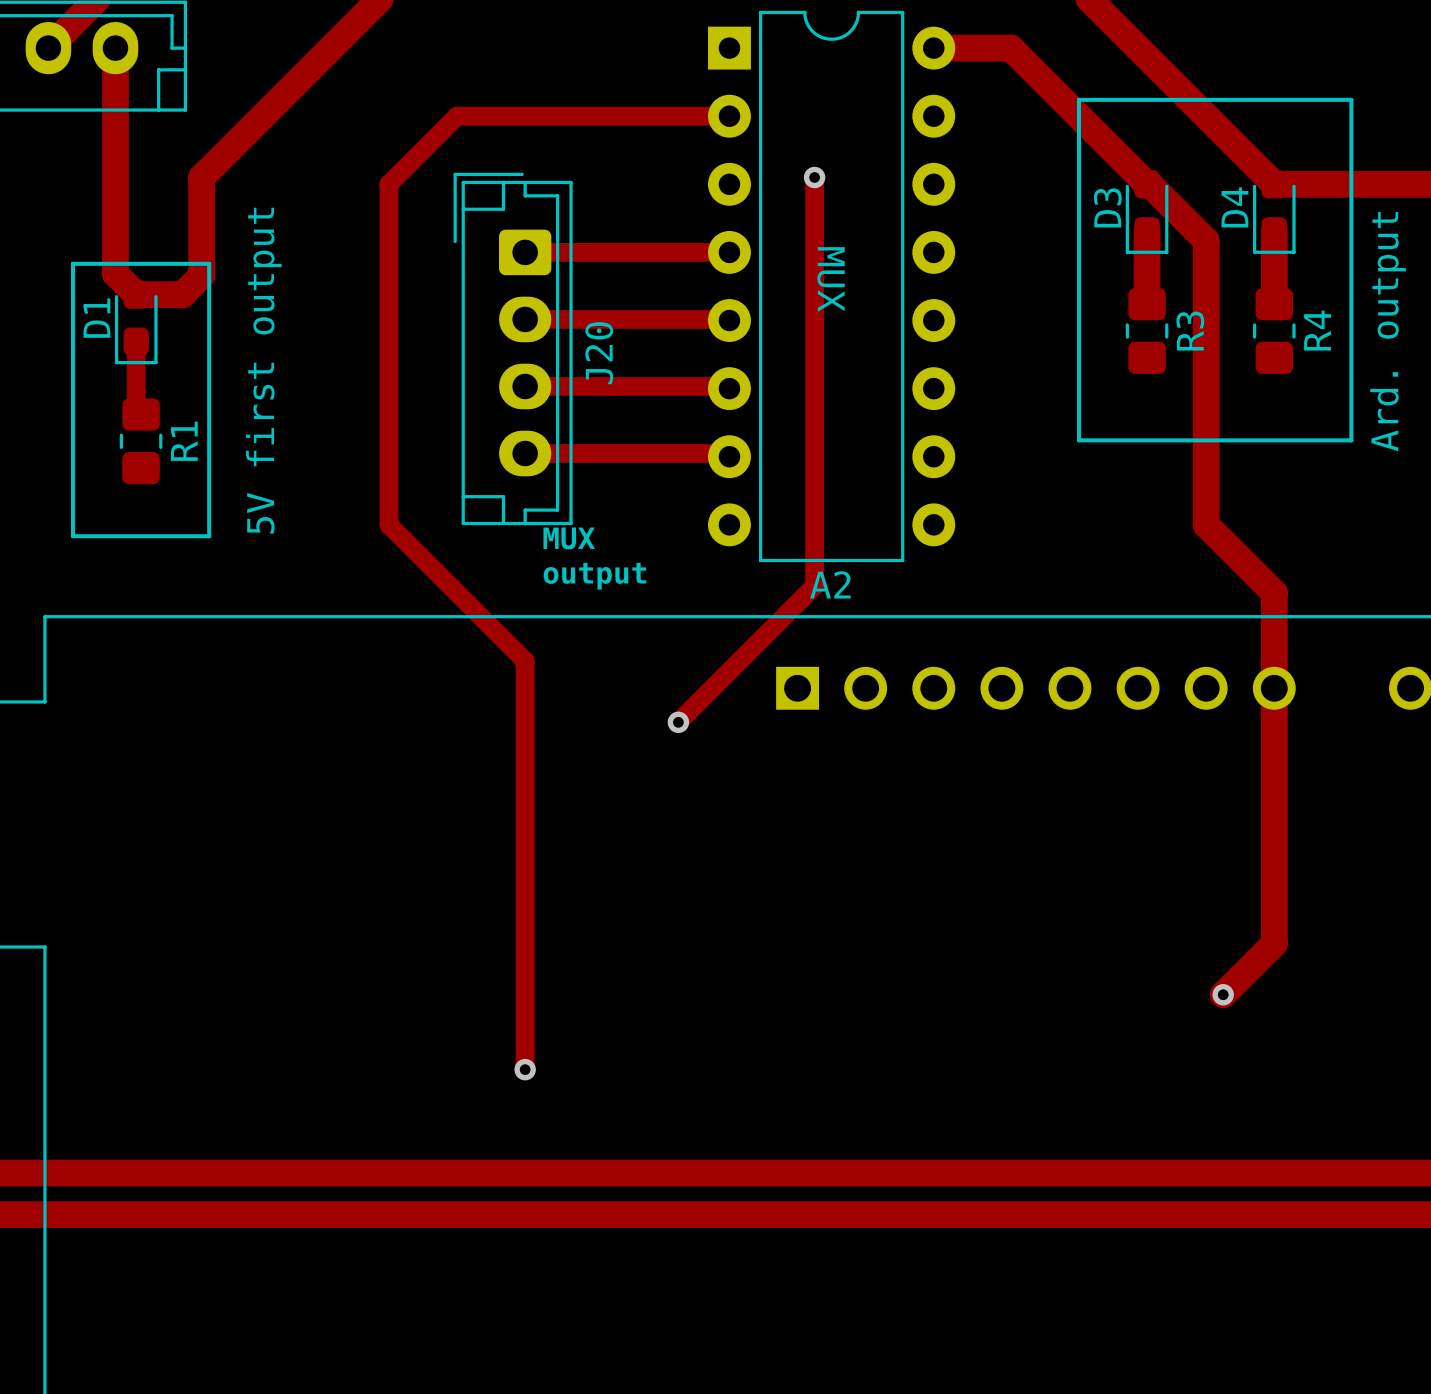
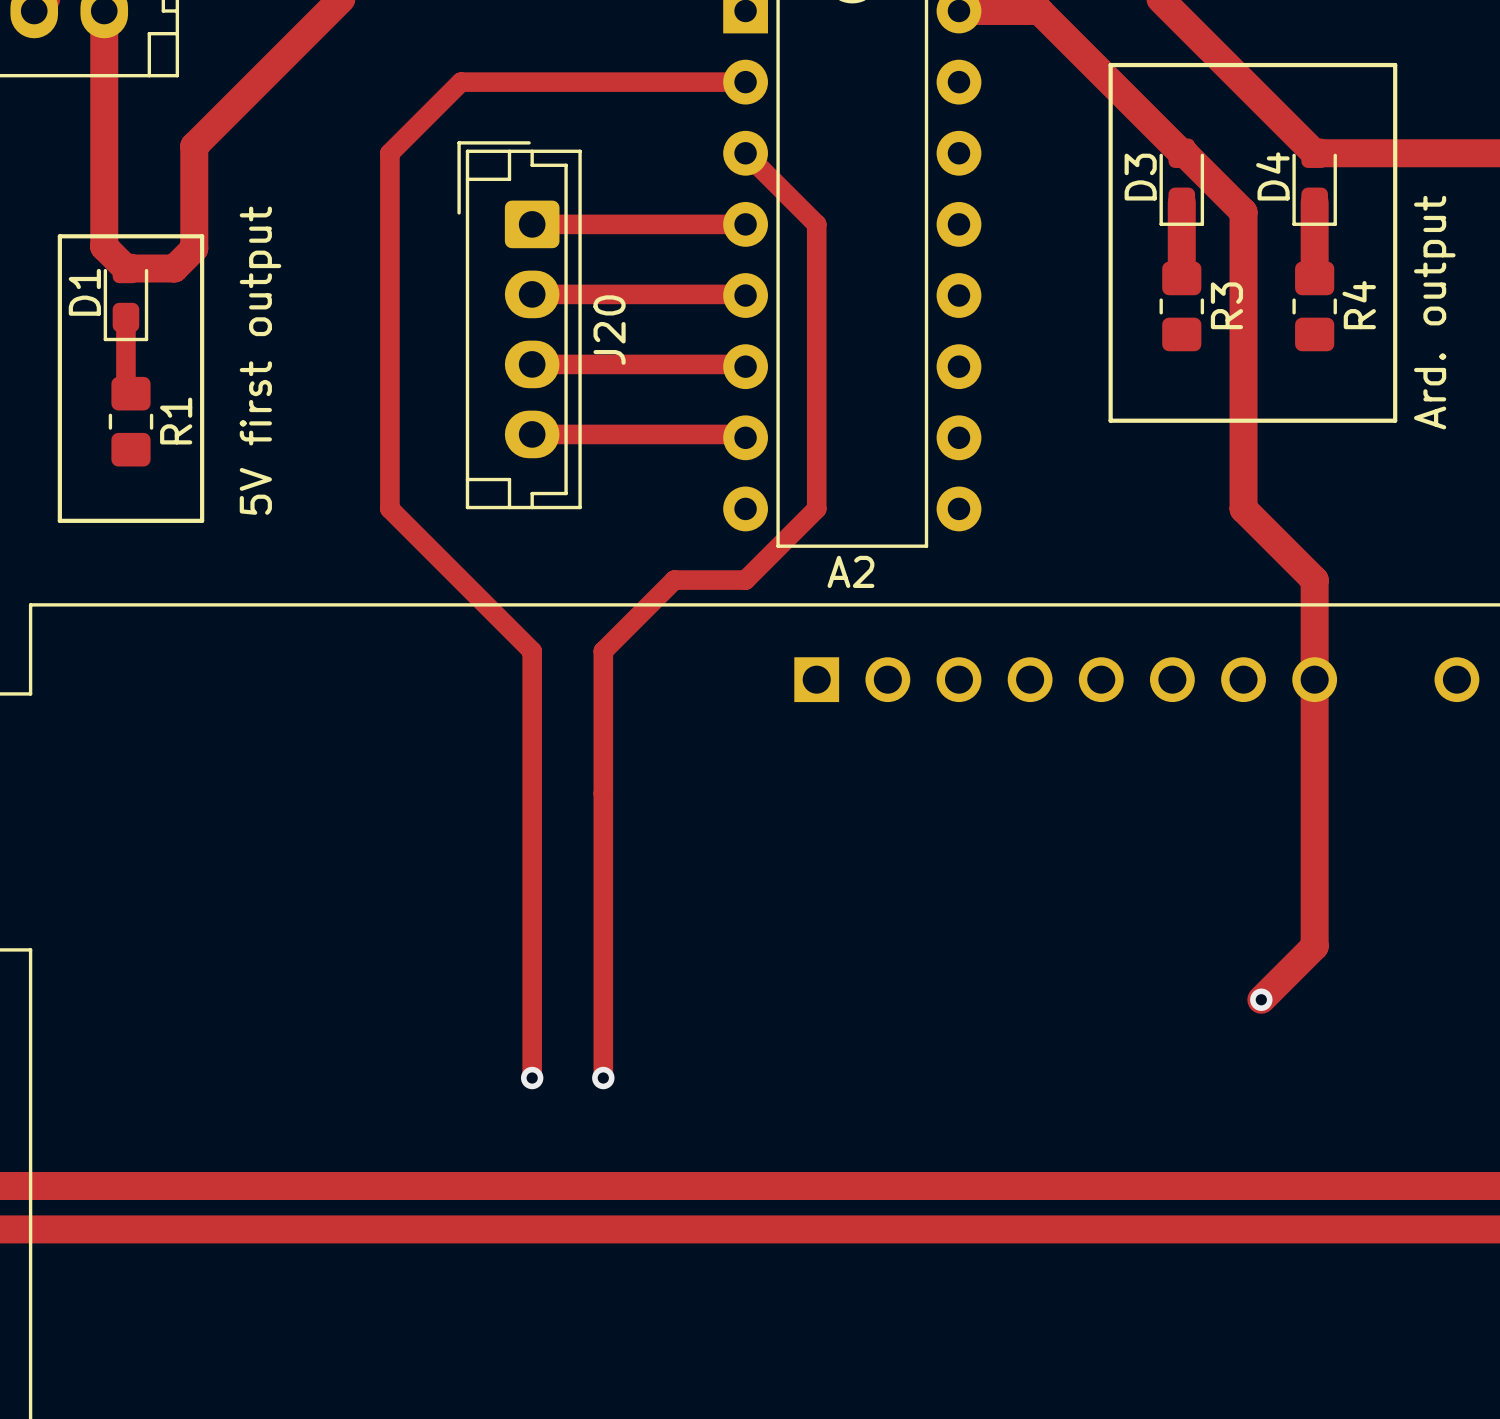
track: (814, 177) (814, 586) (678, 722) -> none
via: (814, 177) -> none
track: none -> (745, 153) (816, 224) (816, 508) (745, 580) (674, 580) (603, 651) (603, 1078)
text: MUX (831, 279) -> none
text: MUX (569, 538) -> none
text: output (594, 576) -> none
via: (678, 722) -> none
via: none -> (603, 1078)

